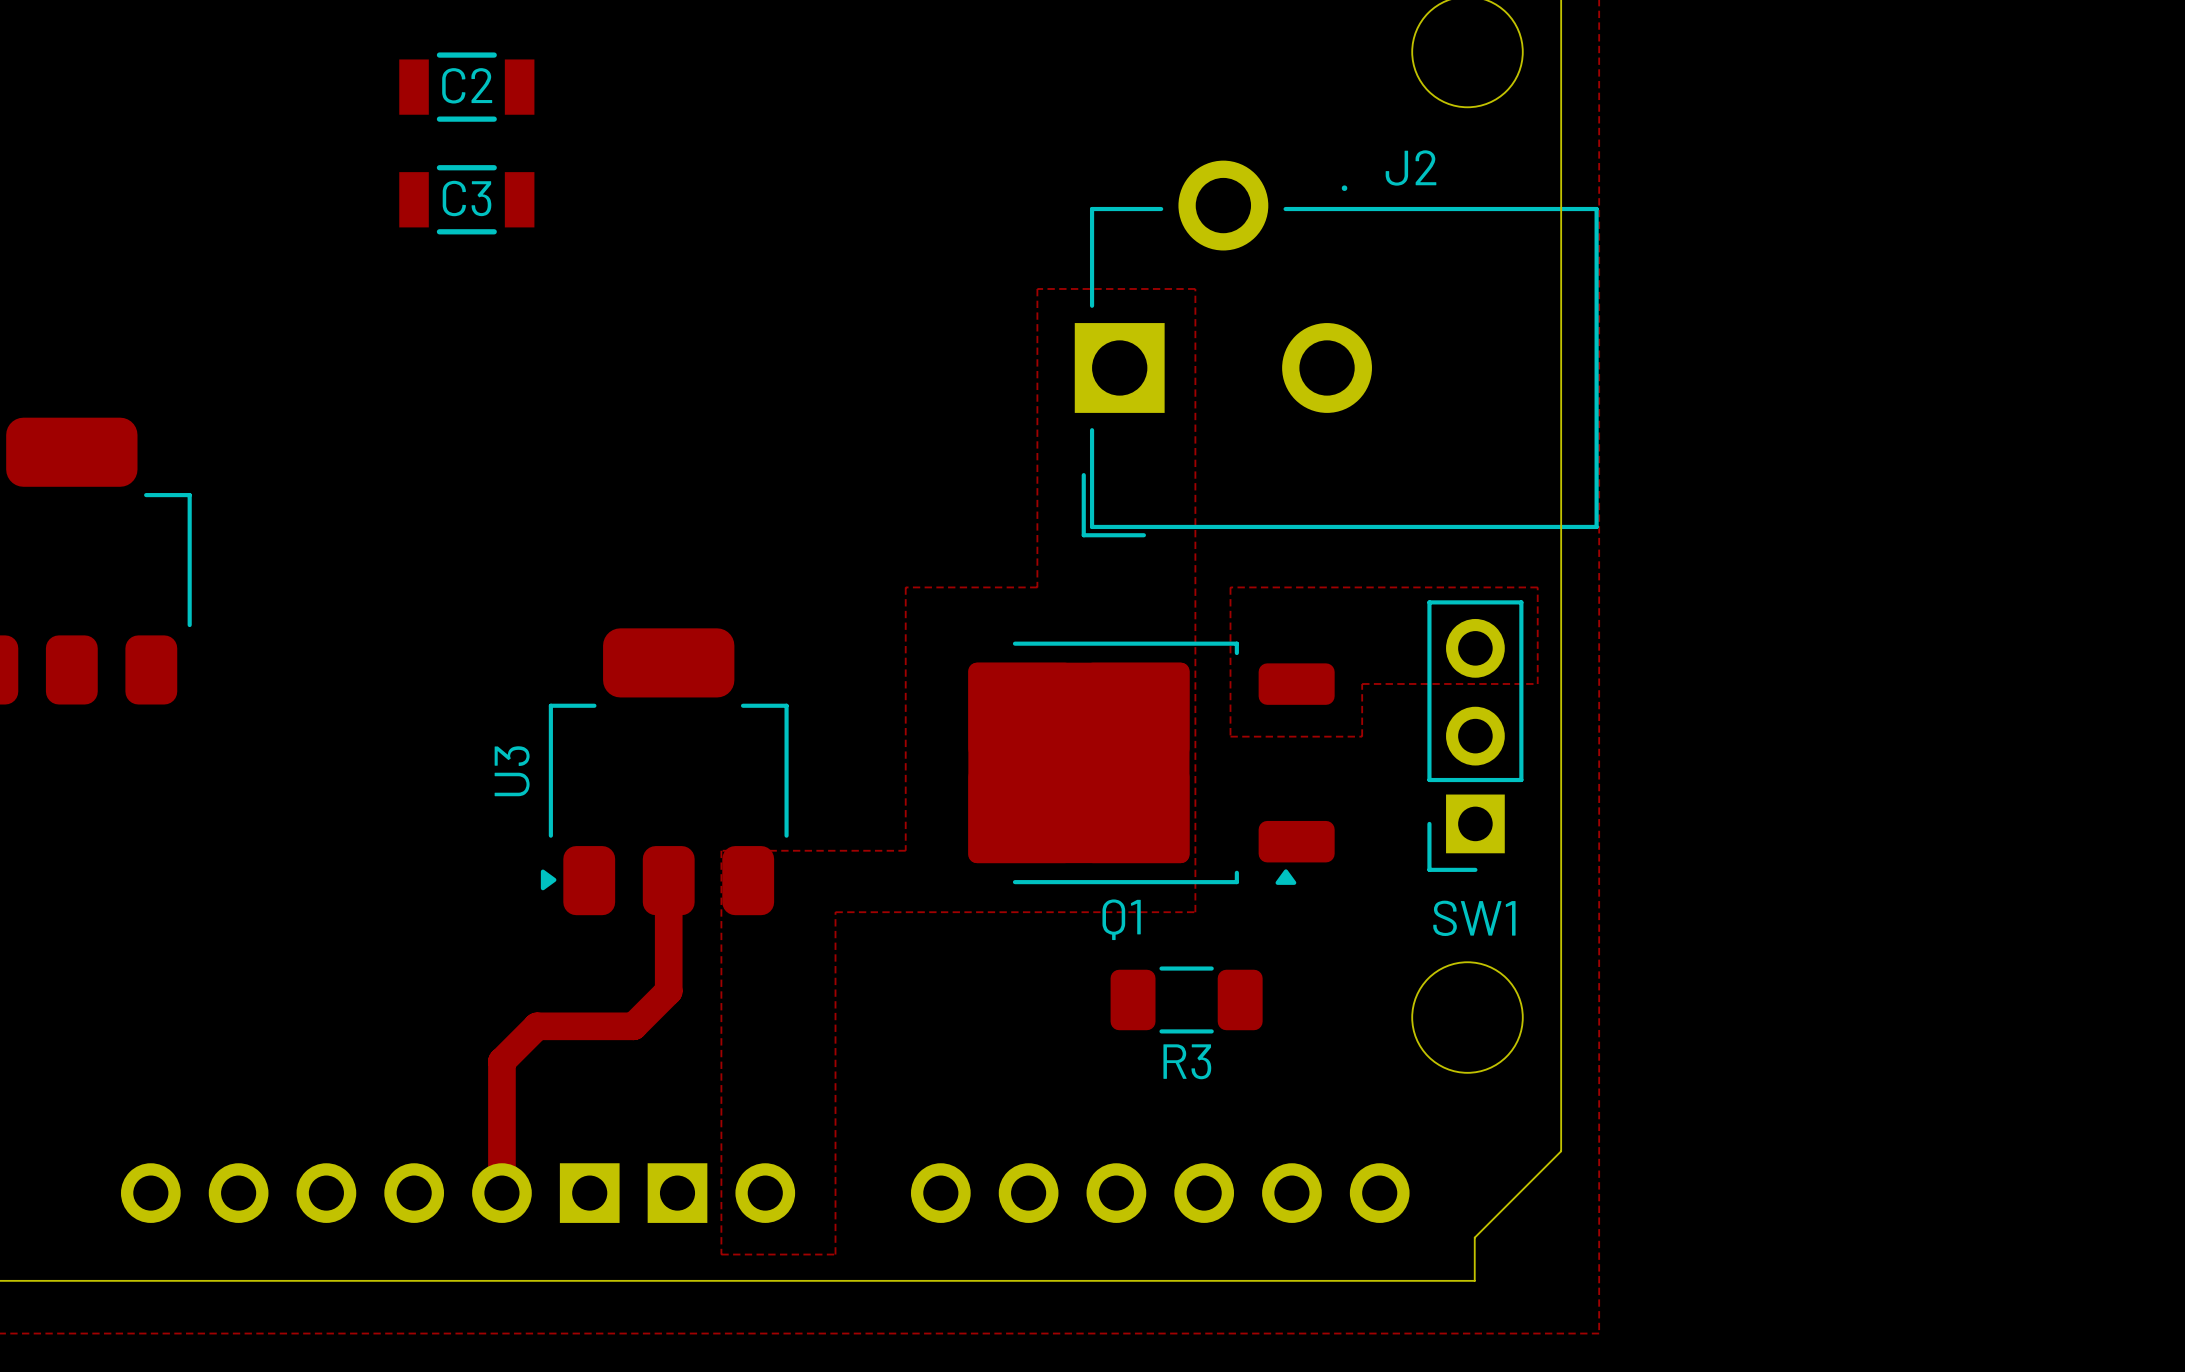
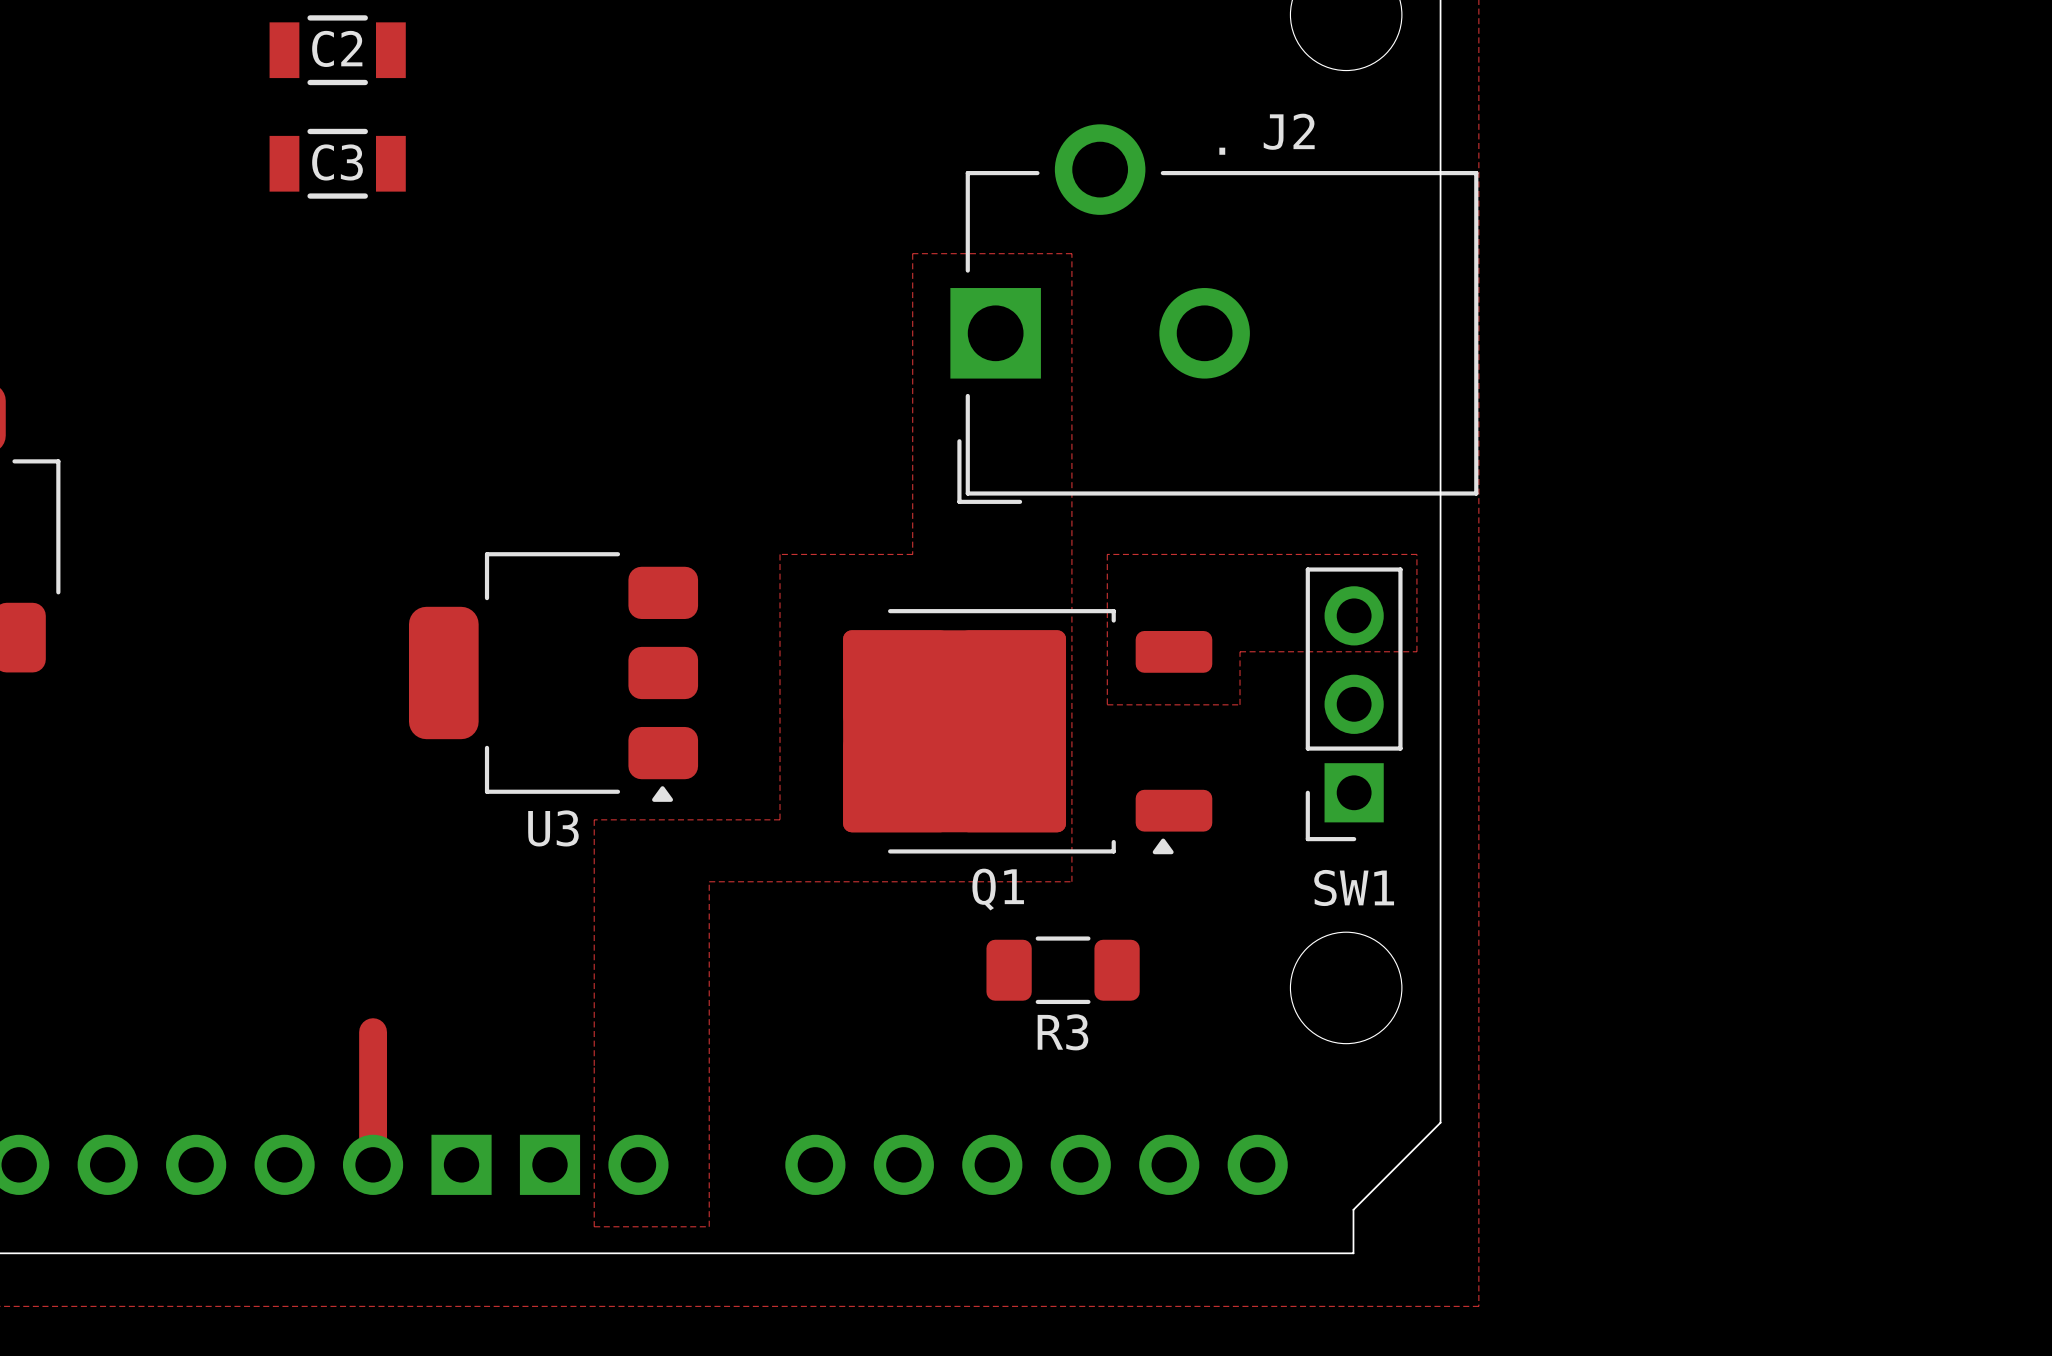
U3 rotation: 0° (664, 771) -> 90° counterclockwise (553, 676)
top track: (668, 880) (668, 991) (633, 1026) (537, 1026) (501, 1061) -> none

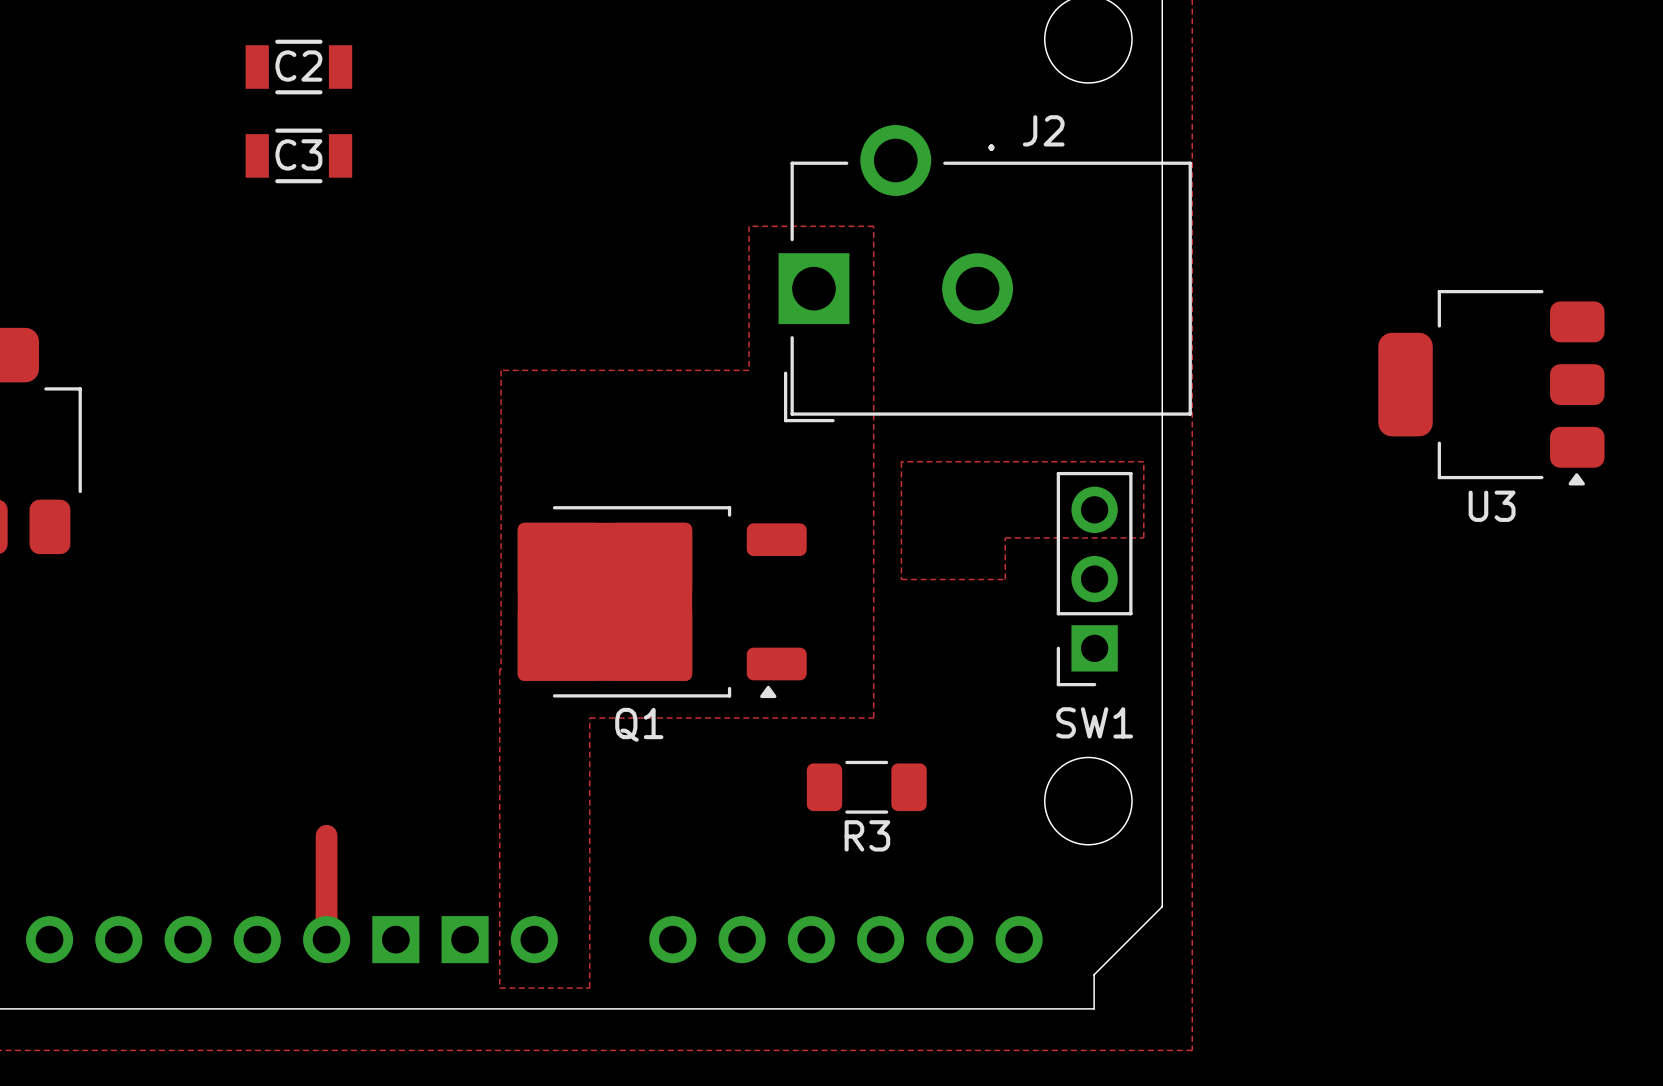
top zone outline: (912, 437) (912, 554) (780, 554) (780, 819) (595, 819) -> (749, 370) (501, 370) (501, 669)
U3 position: (553, 676) -> (1491, 387)
Q1 position: (1027, 731) -> (662, 602)

